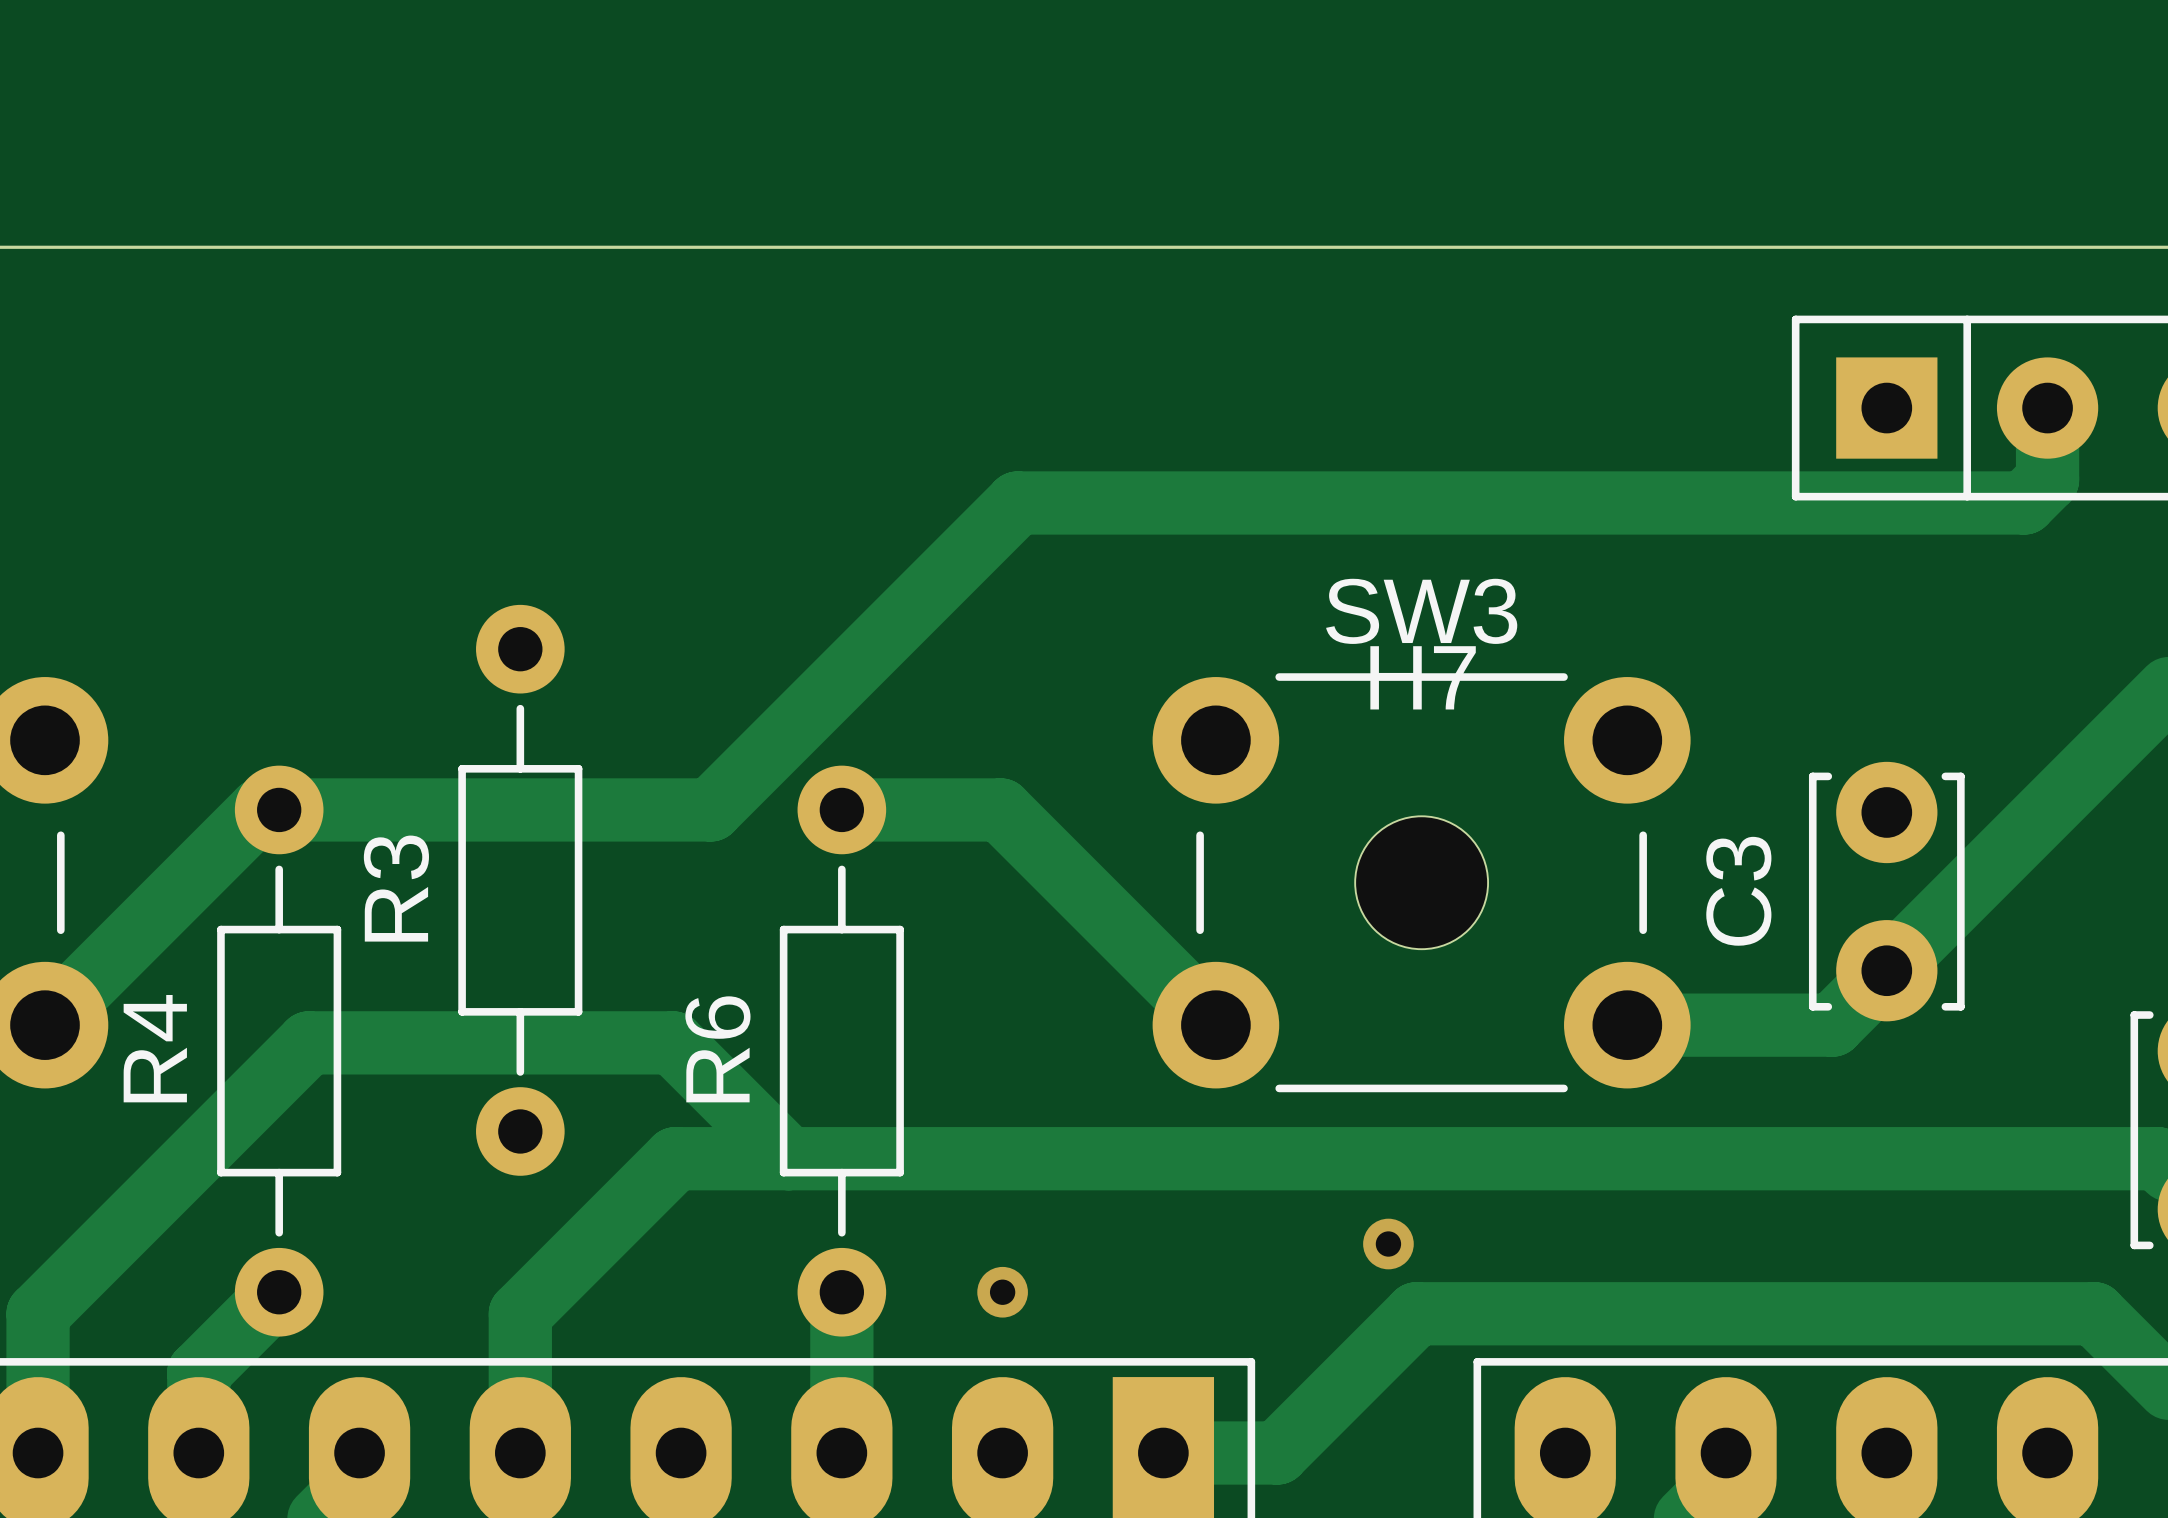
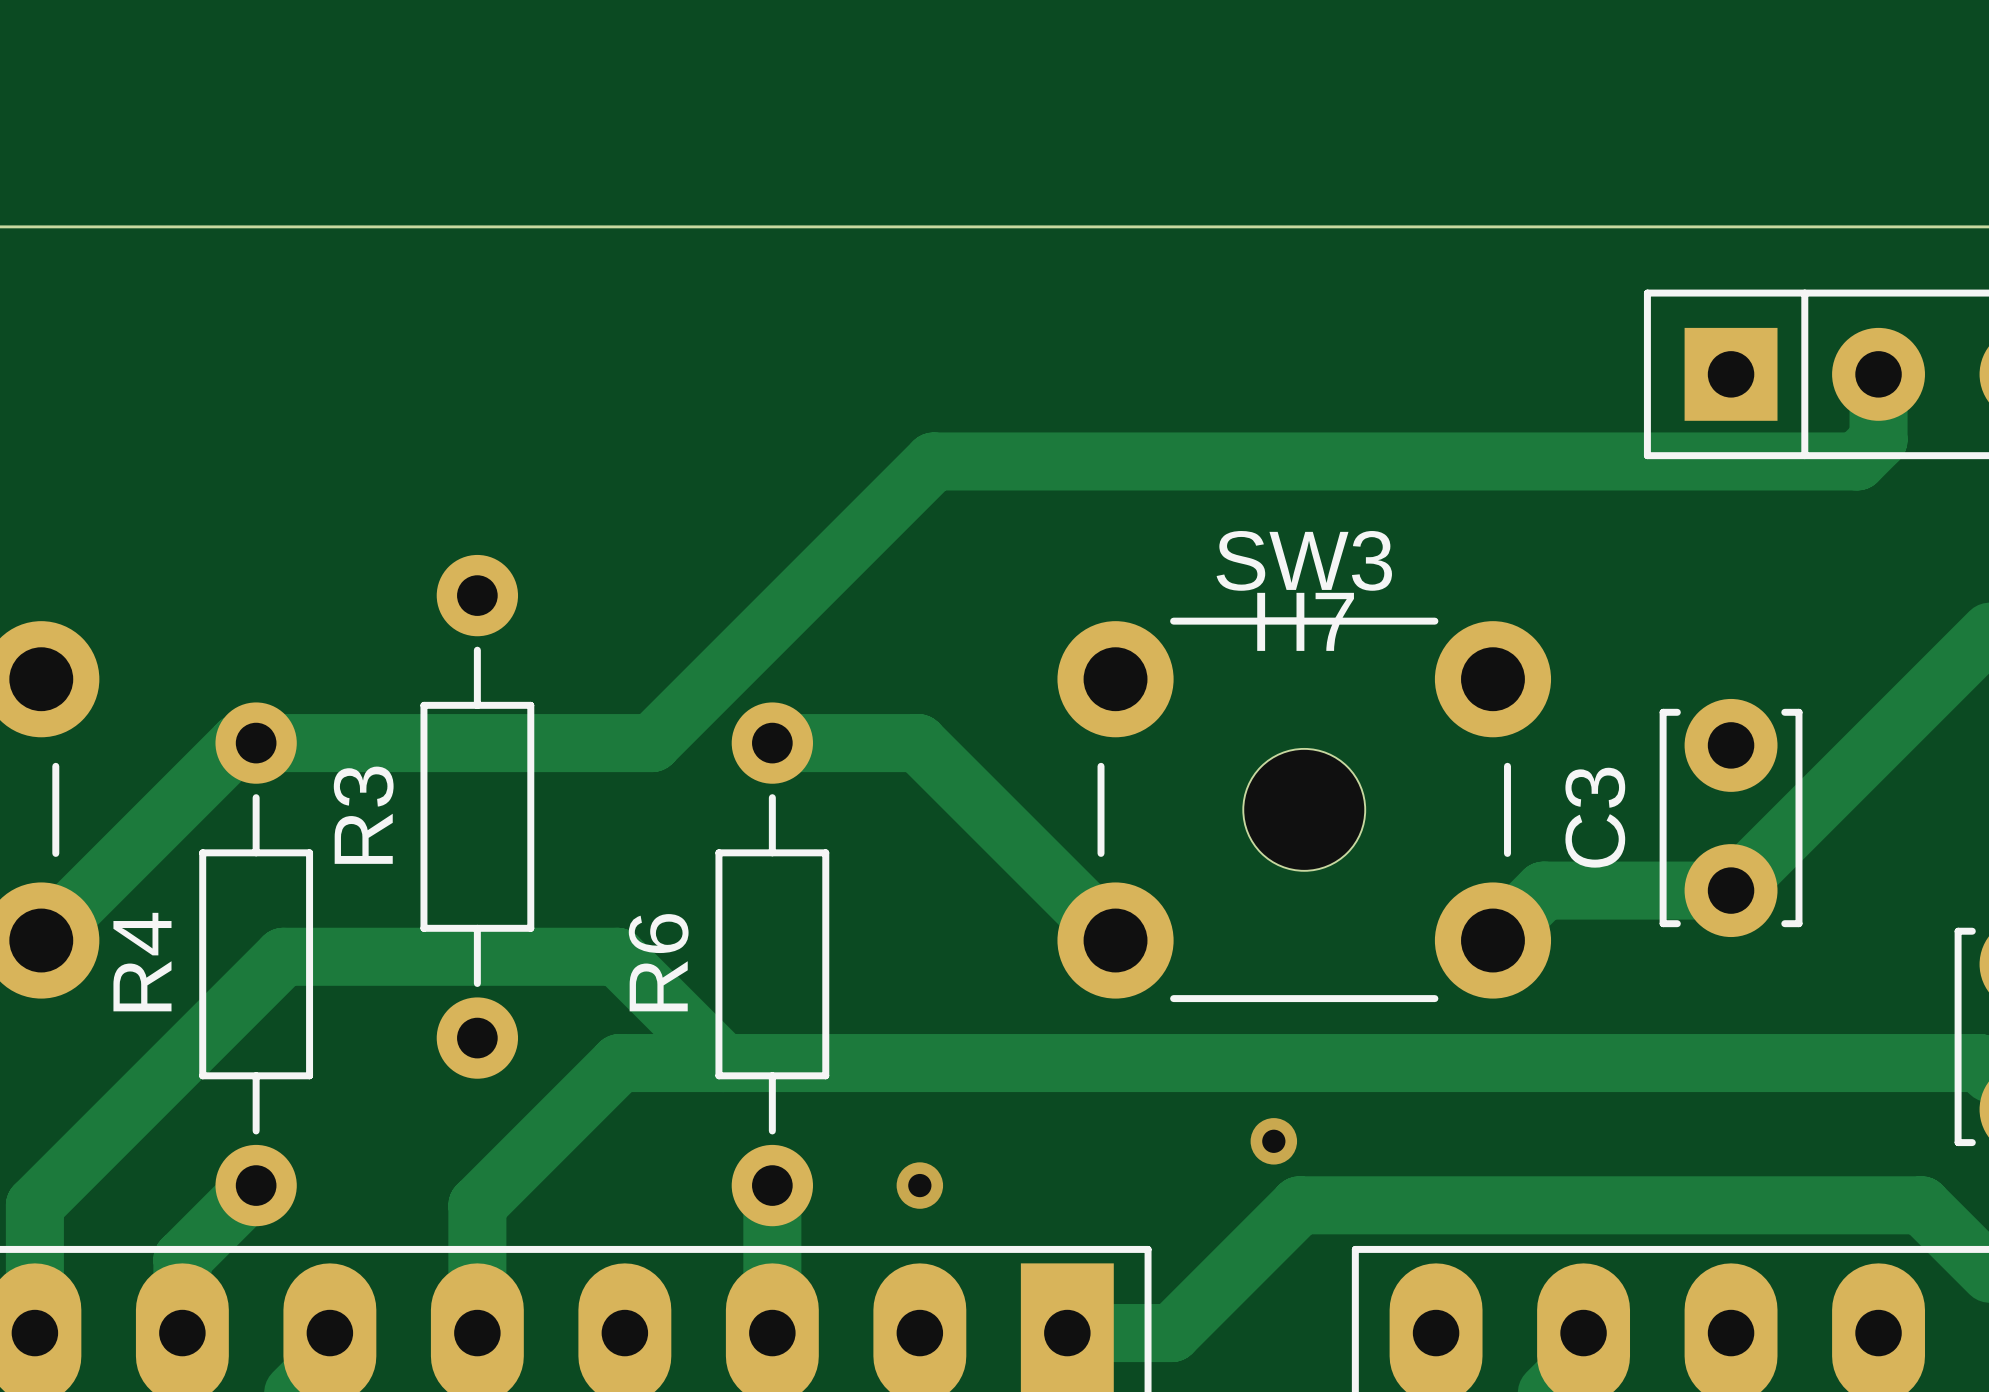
track: (1886, 970) (1832, 1025) (1627, 1025) -> (1731, 890) (1543, 890) (1492, 941)

